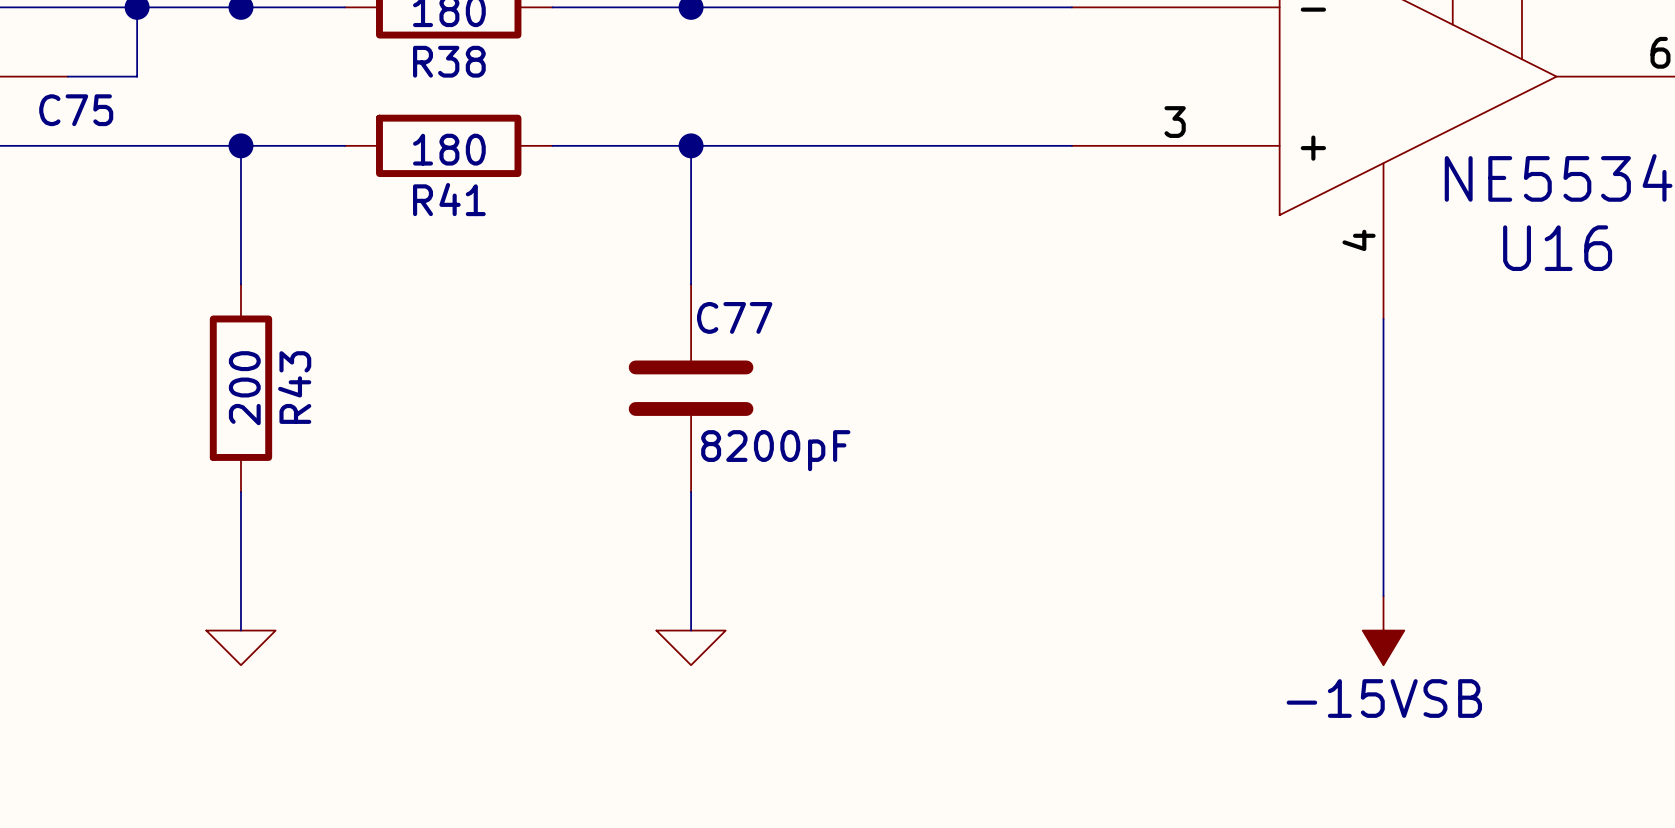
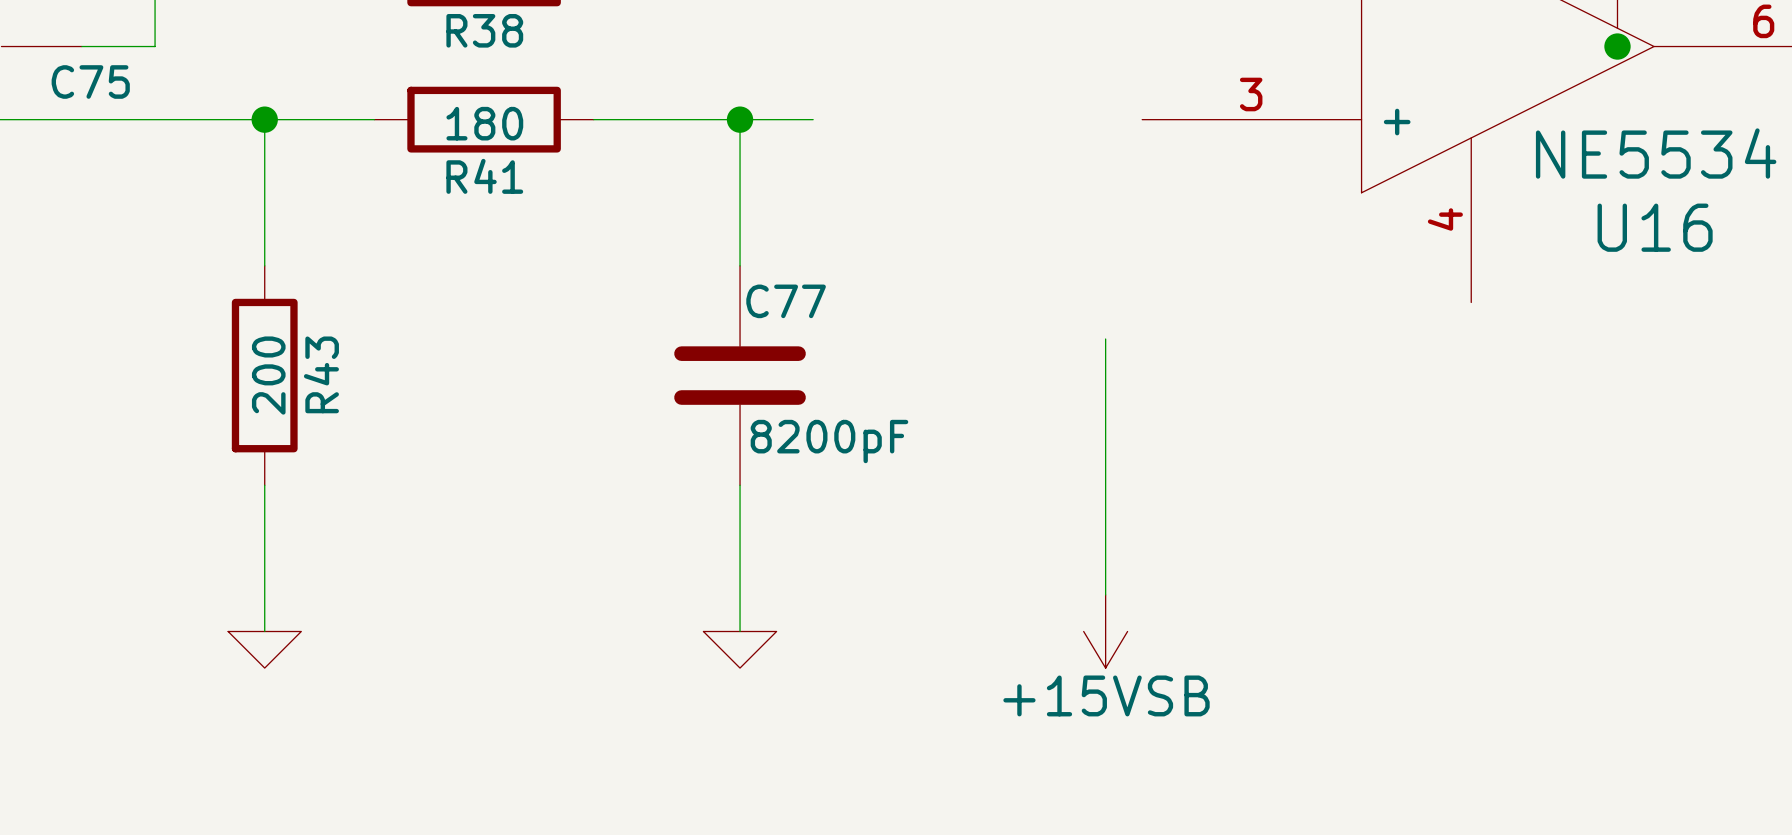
junction: none -> (1617, 46)
wire: (760, 145) (1071, 145) -> none
wire: (1383, 318) (1383, 595) -> none
wire: none -> (1105, 339) (1105, 594)
power symbol: none -> +15VSB (1105, 631)
power symbol: -15VSB (1383, 630) -> none

